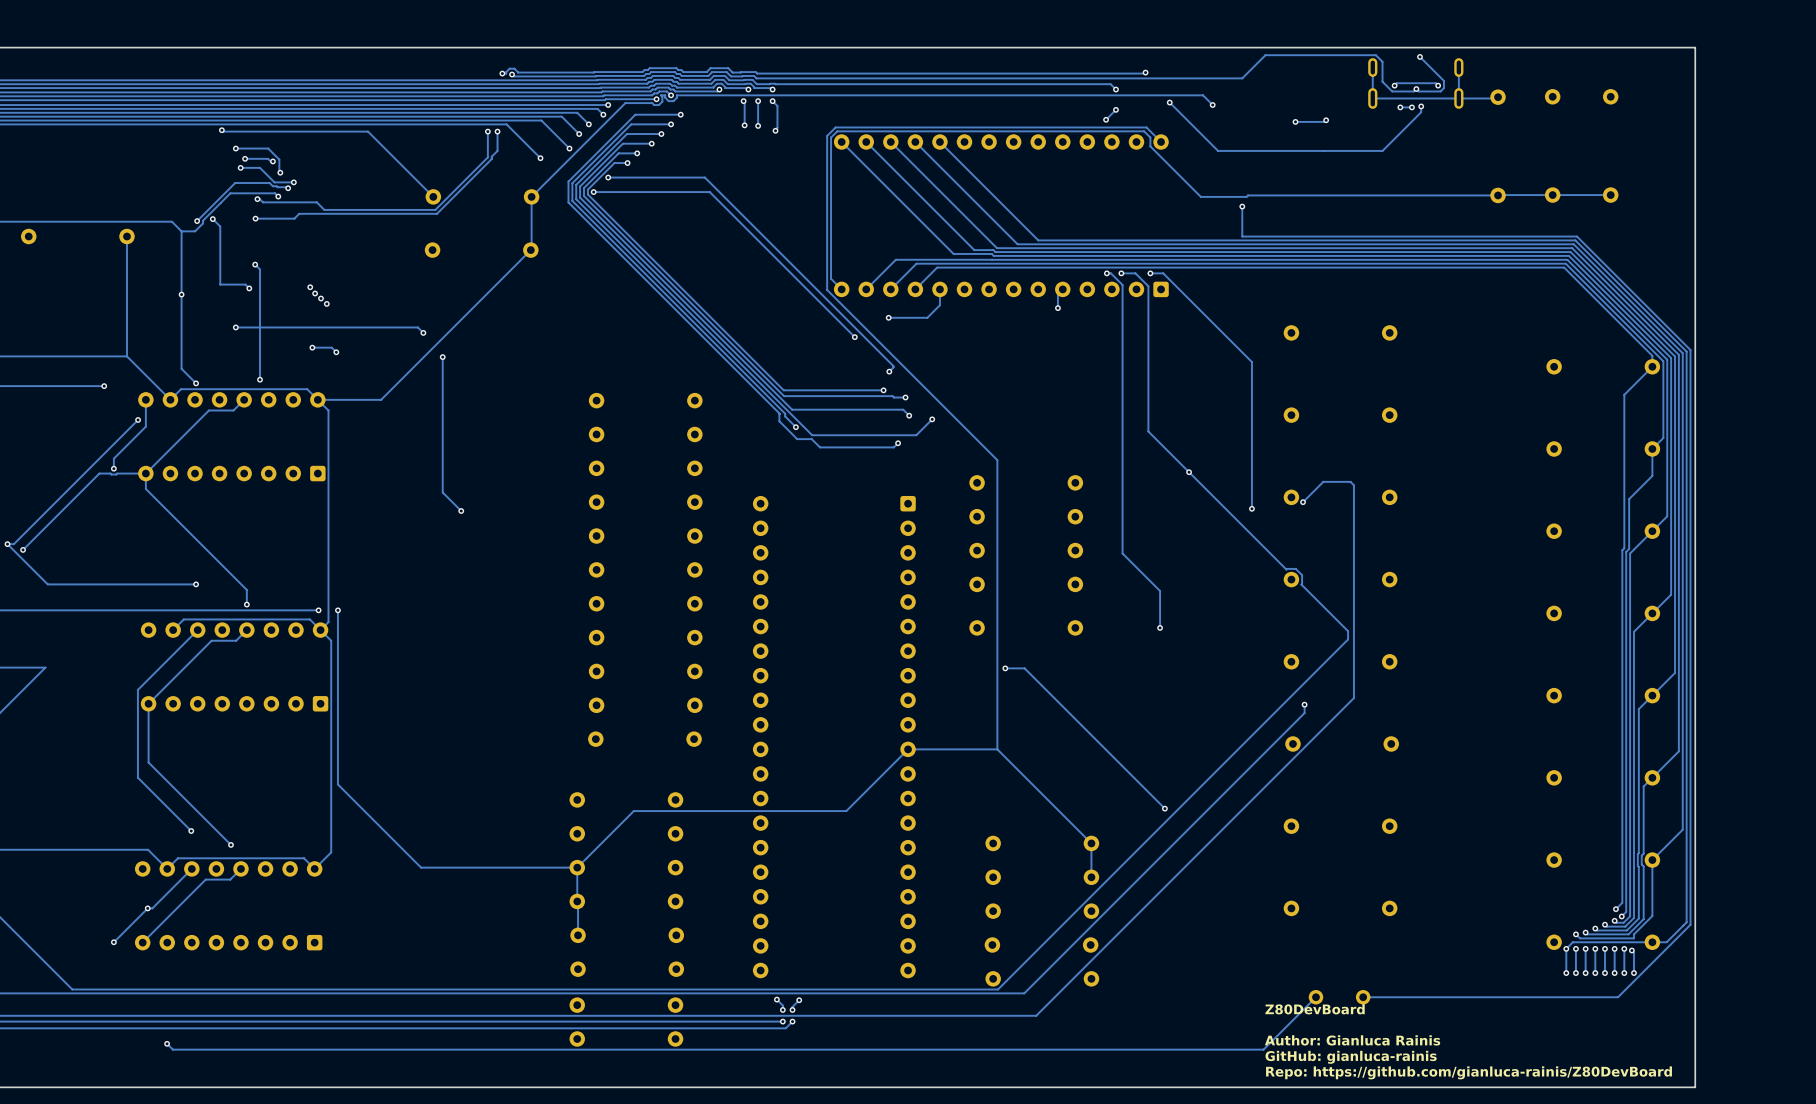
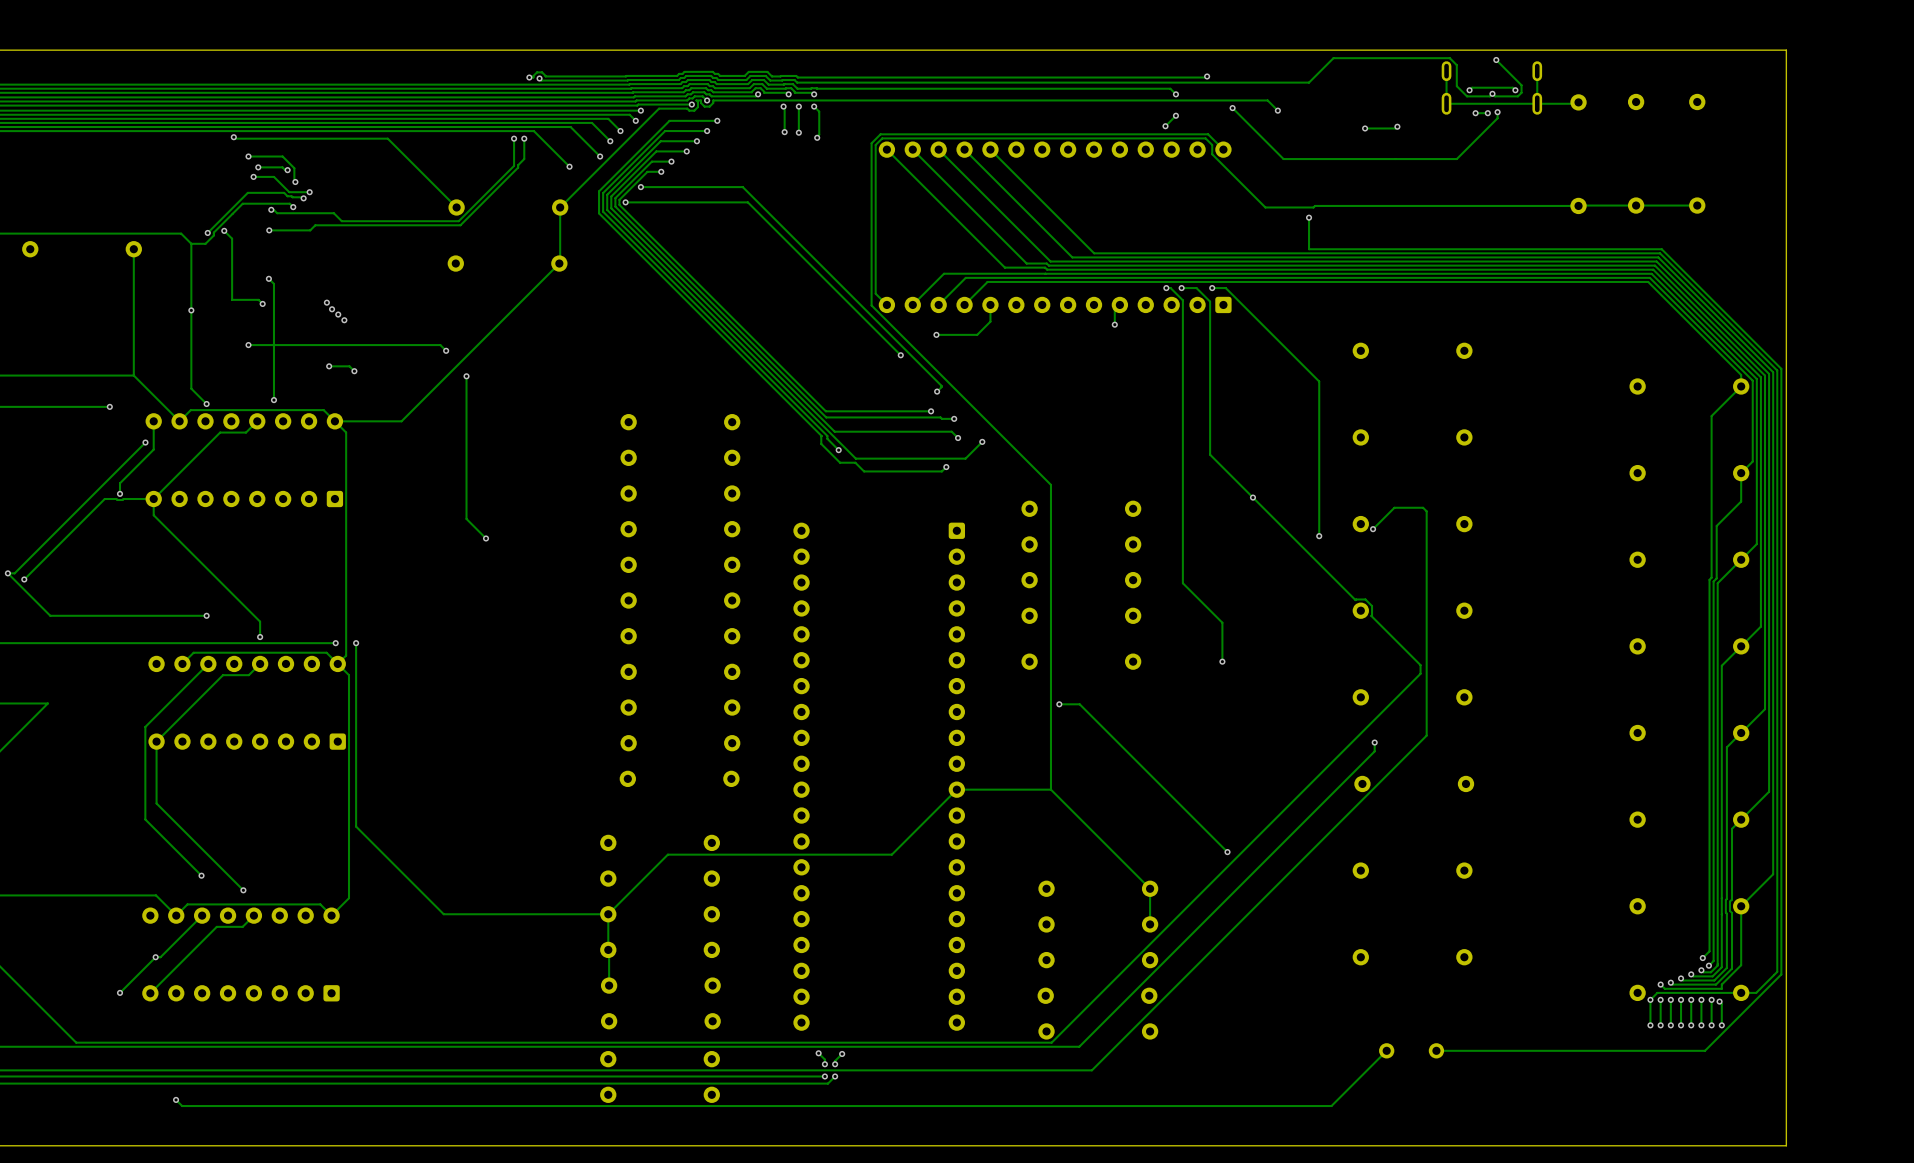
text: Z80DevBoard (1315, 1009) -> none
text: Author: Gianluca Rainis (1352, 1040) -> none
text: GitHub: gianluca-rainis (1351, 1057) -> none
text: Repo: https://github.com/gianluca-rainis/Z80DevBoard (1469, 1072) -> none

